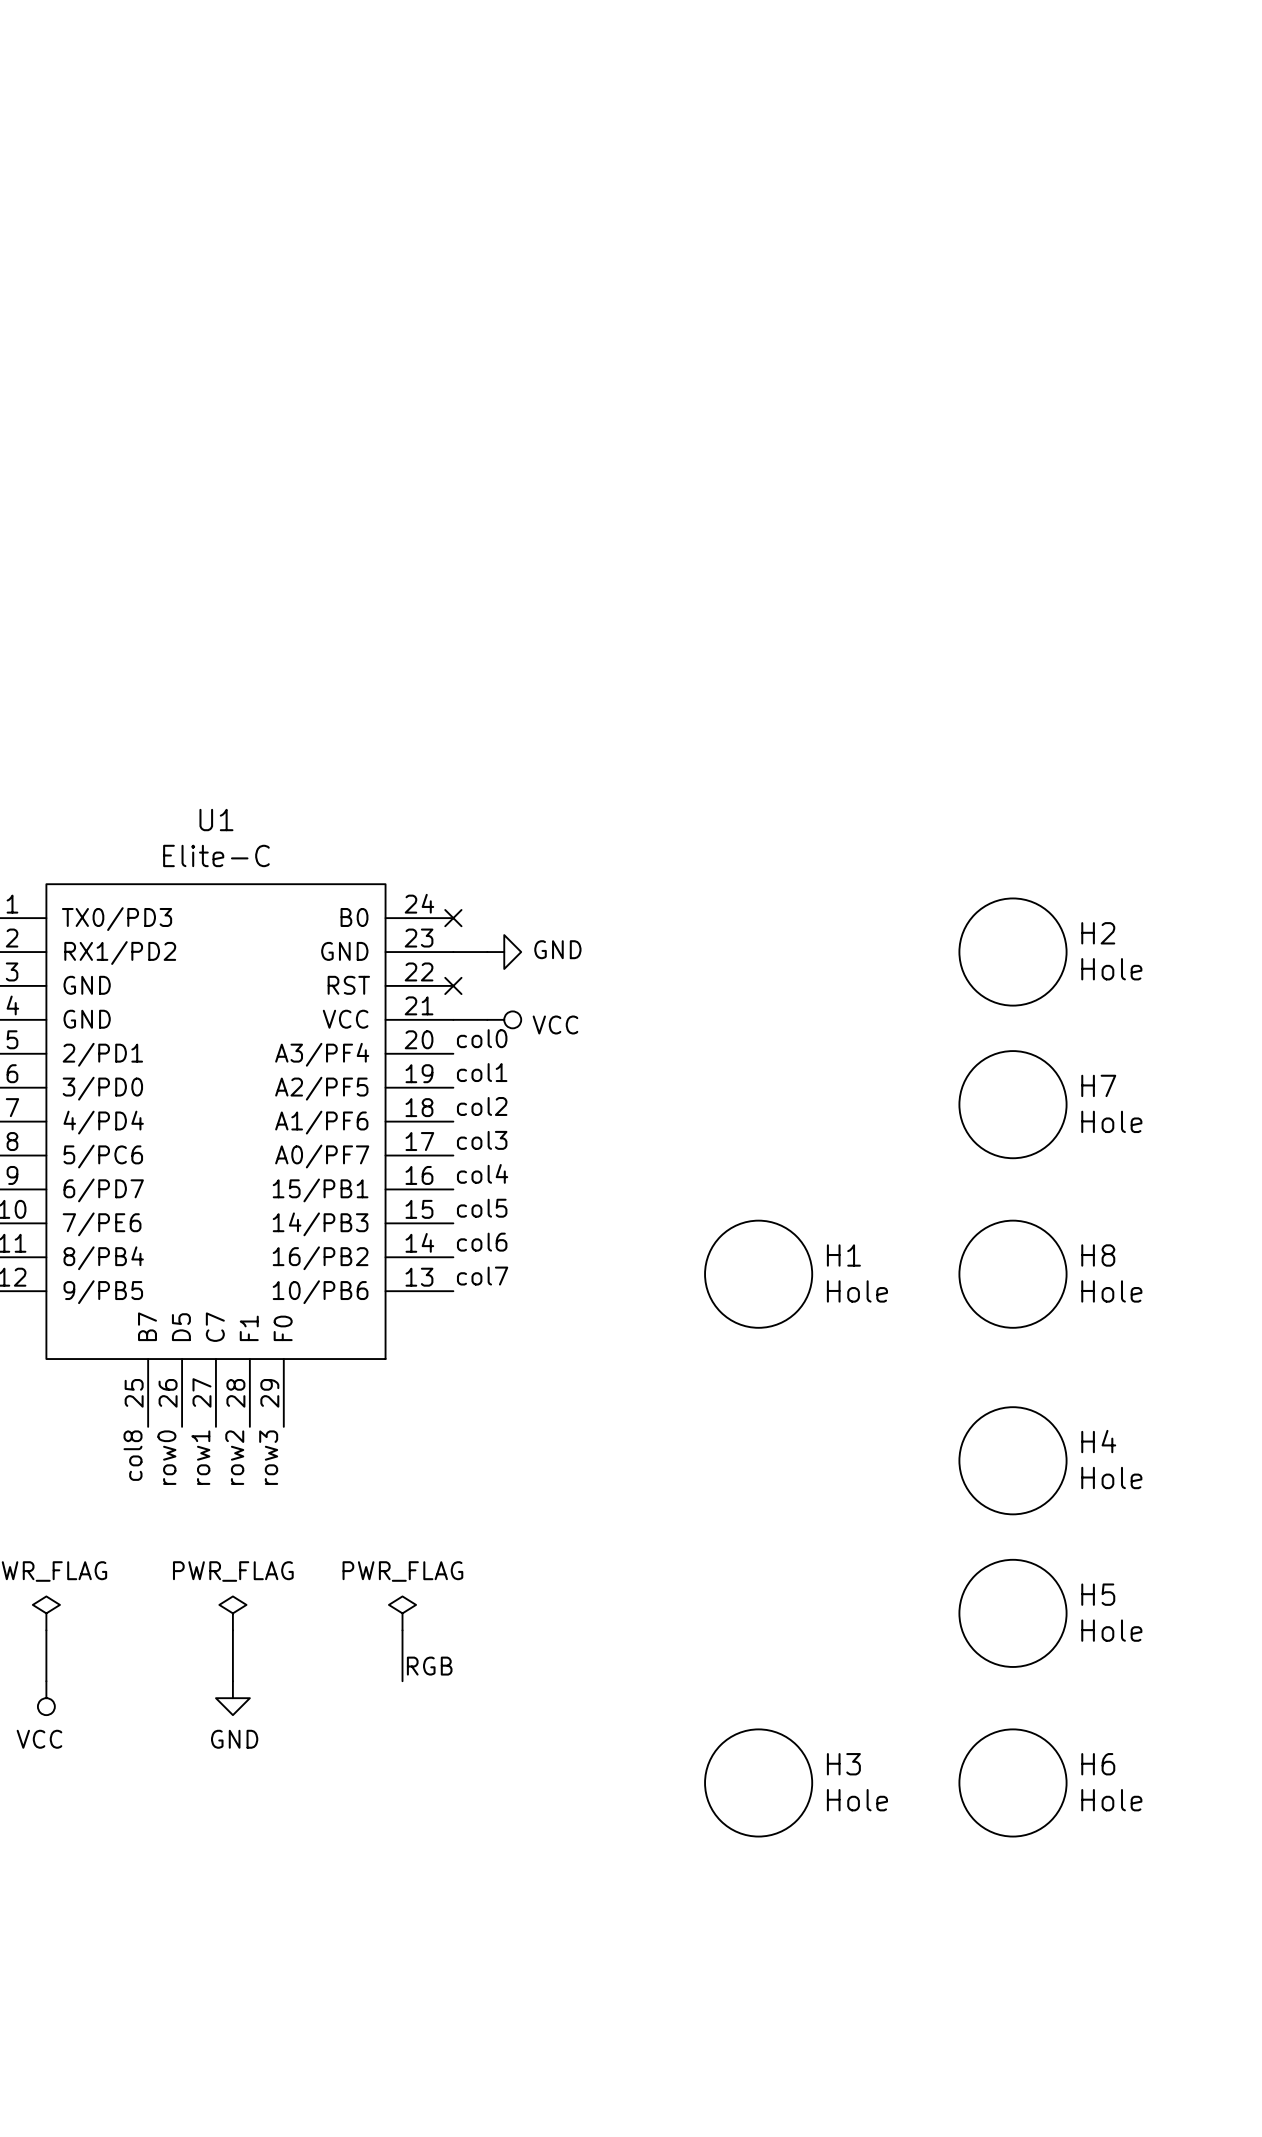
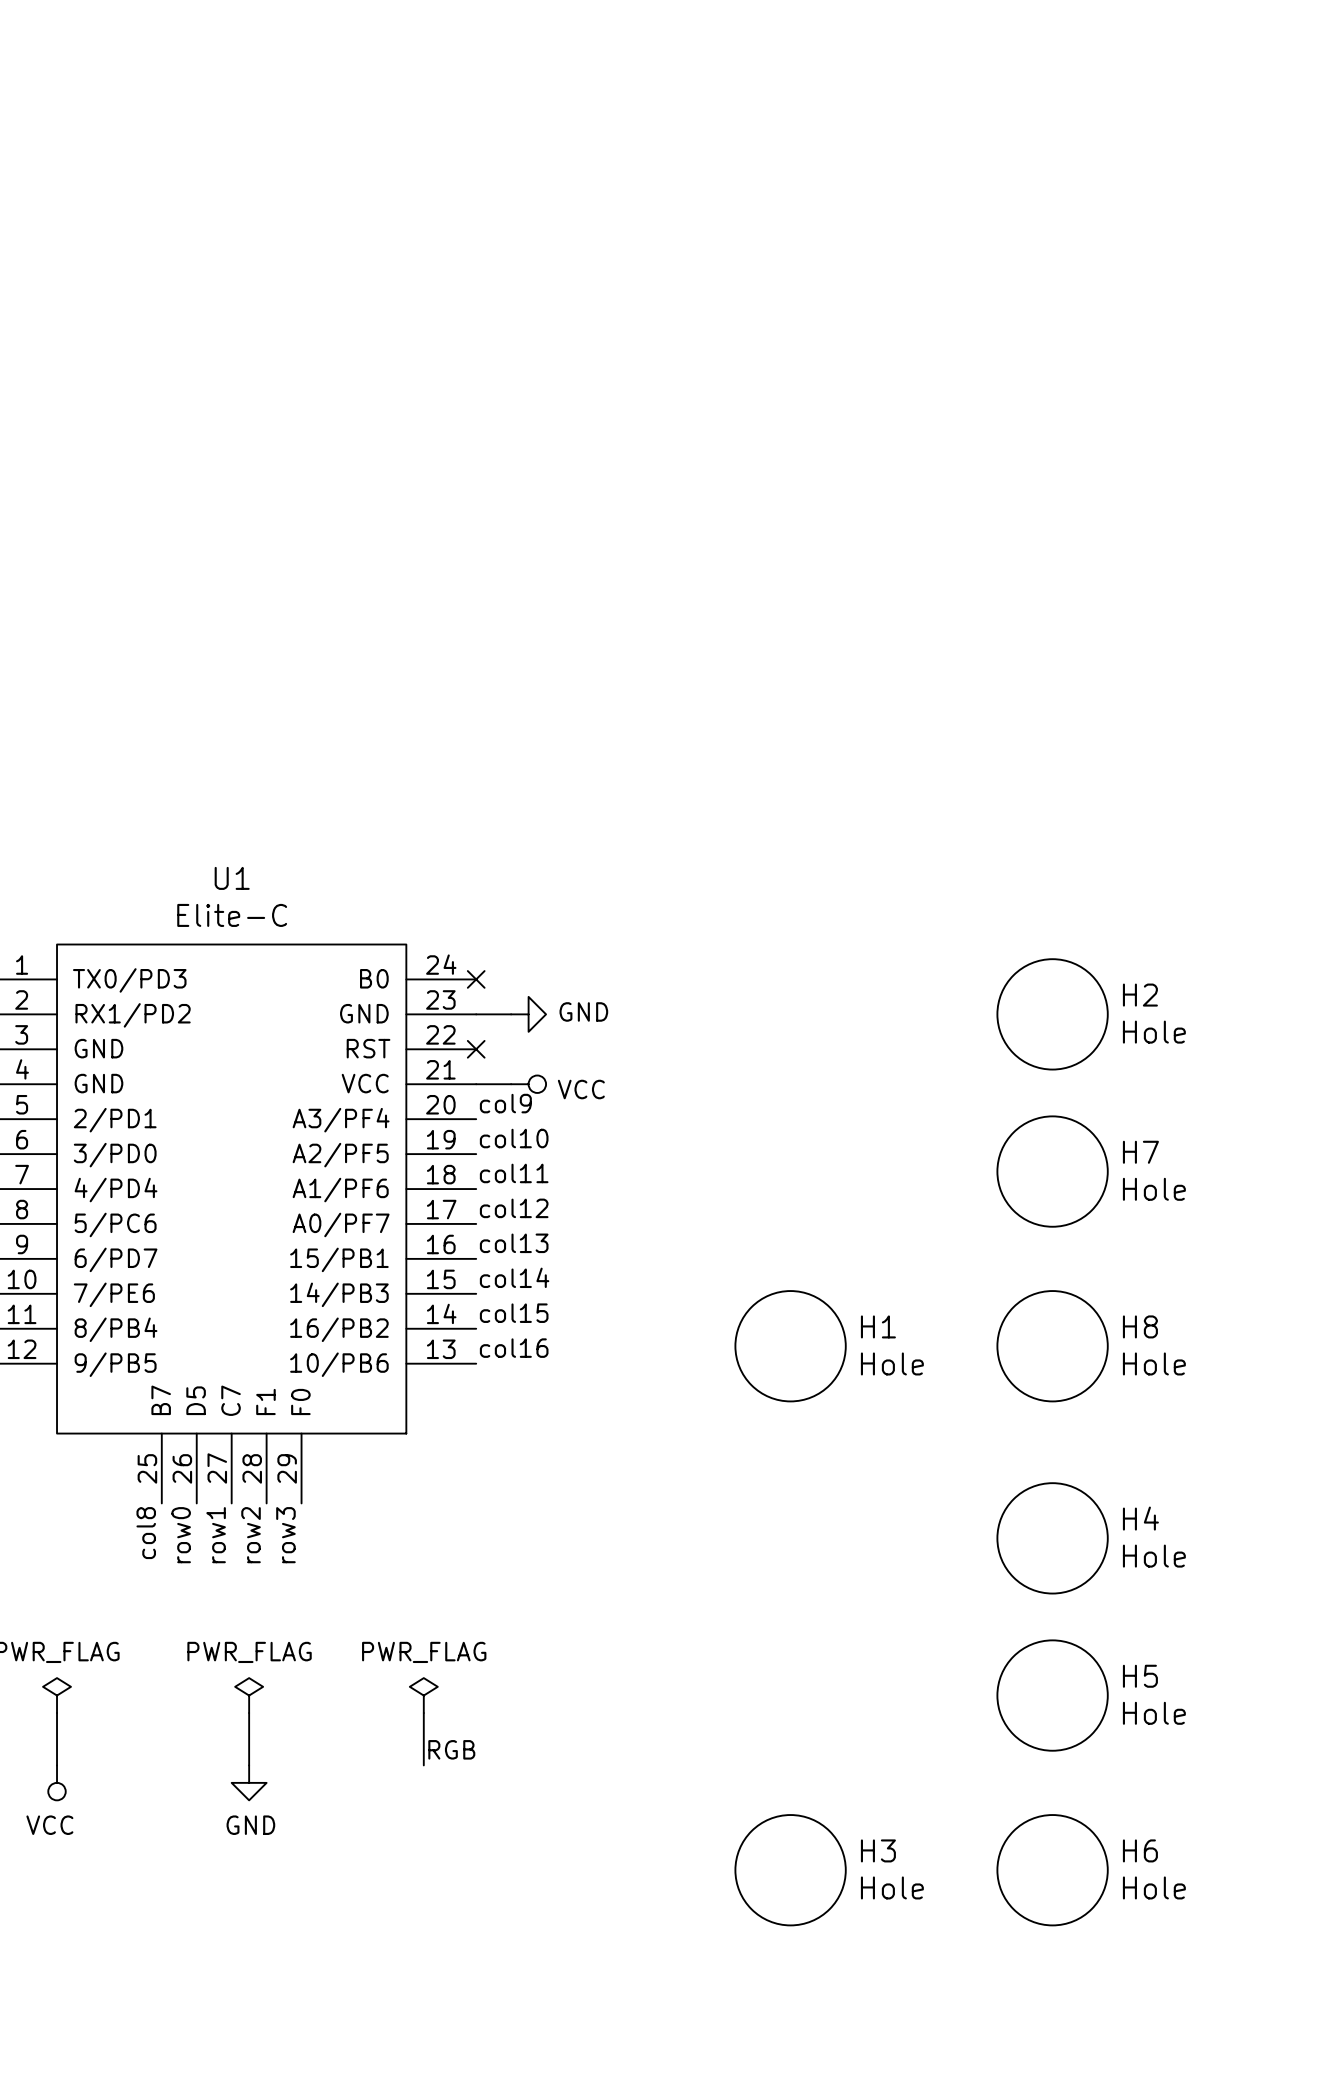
label: col0 (482, 1038) -> col9 (505, 1103)
label: col1 (482, 1072) -> col10 (514, 1138)
label: col2 (482, 1106) -> col11 (514, 1173)
label: col3 (482, 1140) -> col12 (514, 1208)
label: col4 (482, 1173) -> col13 (514, 1243)
label: col5 (482, 1208) -> col14 (514, 1277)
label: col6 (482, 1242) -> col15 (514, 1313)
label: col7 (482, 1276) -> col16 (514, 1348)

